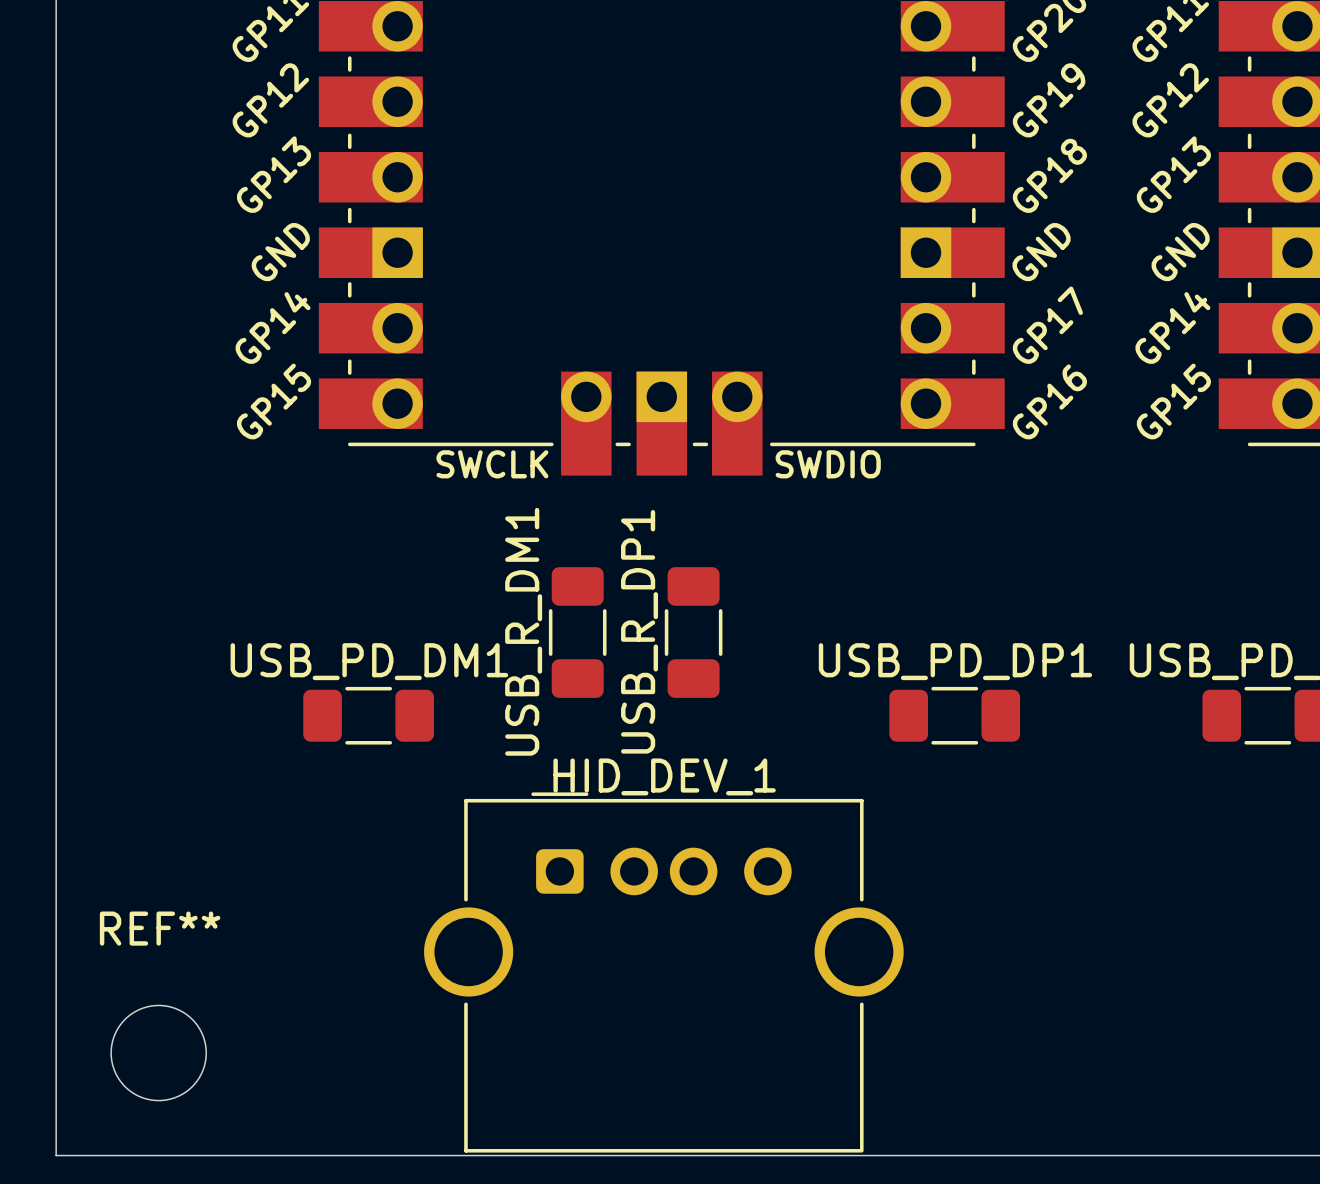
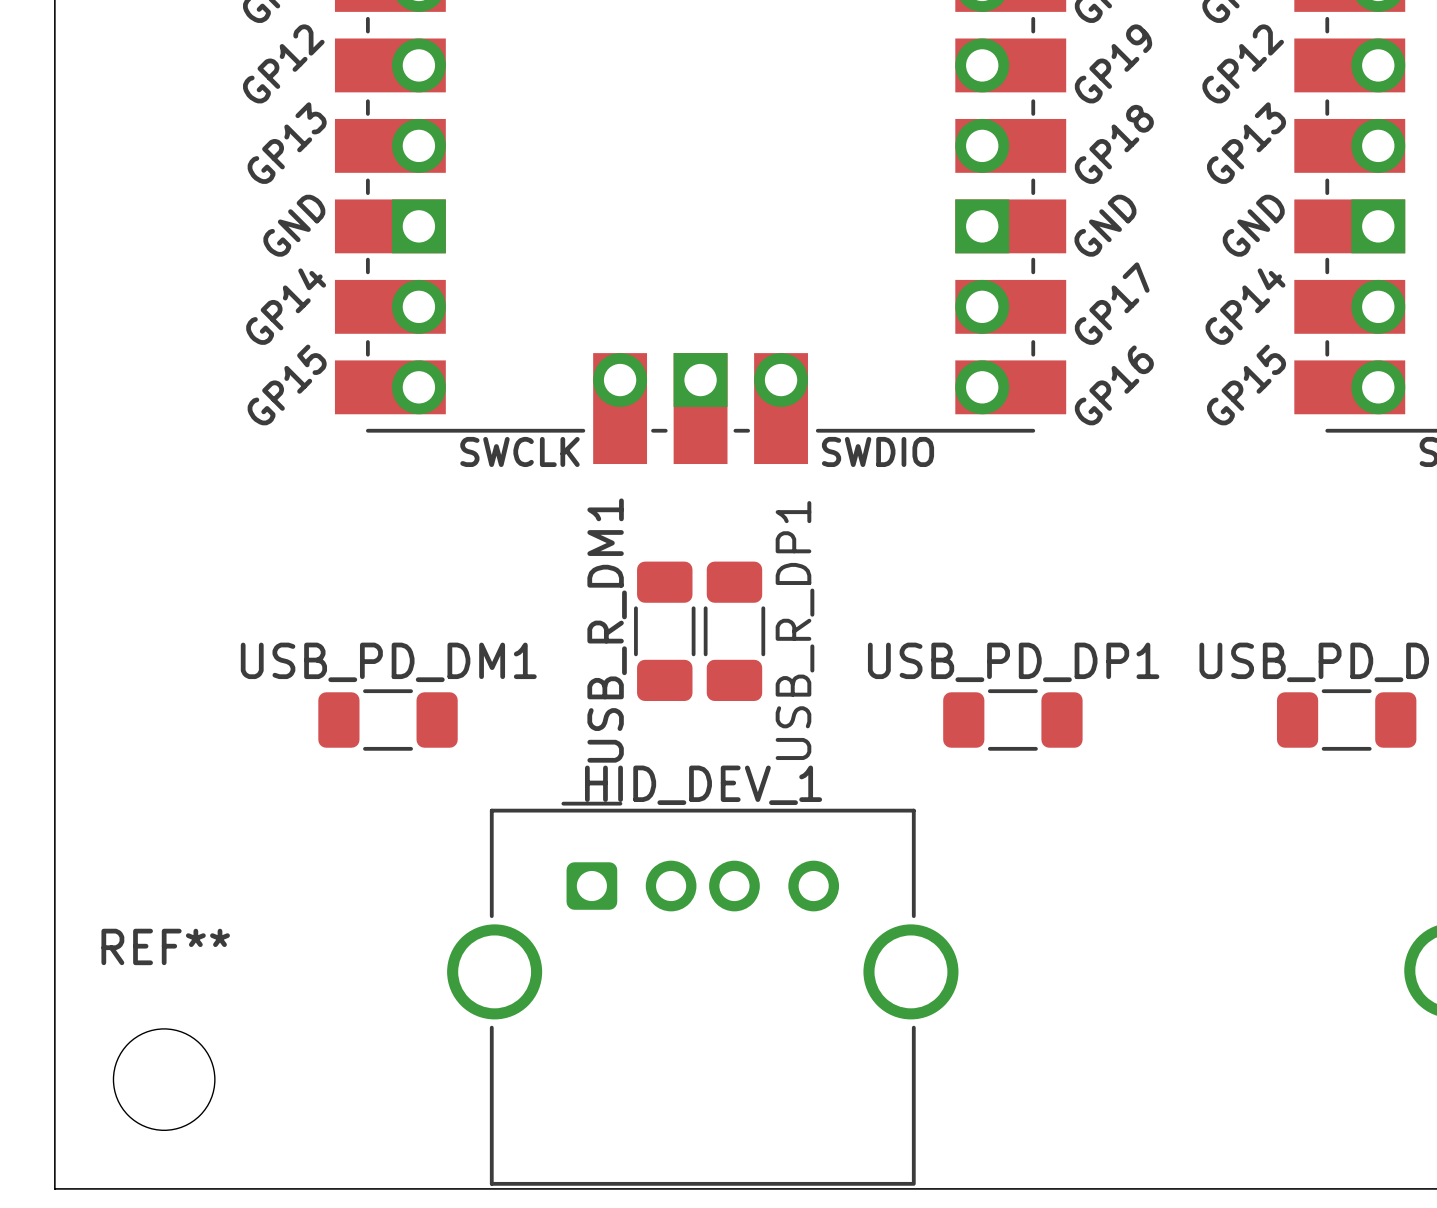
USB_R_DP1 name position: USB_R_DP1 (639, 631) -> USB_R_DP1 (794, 630)
USB_R_DM1 position: (577, 632) -> (664, 631)

